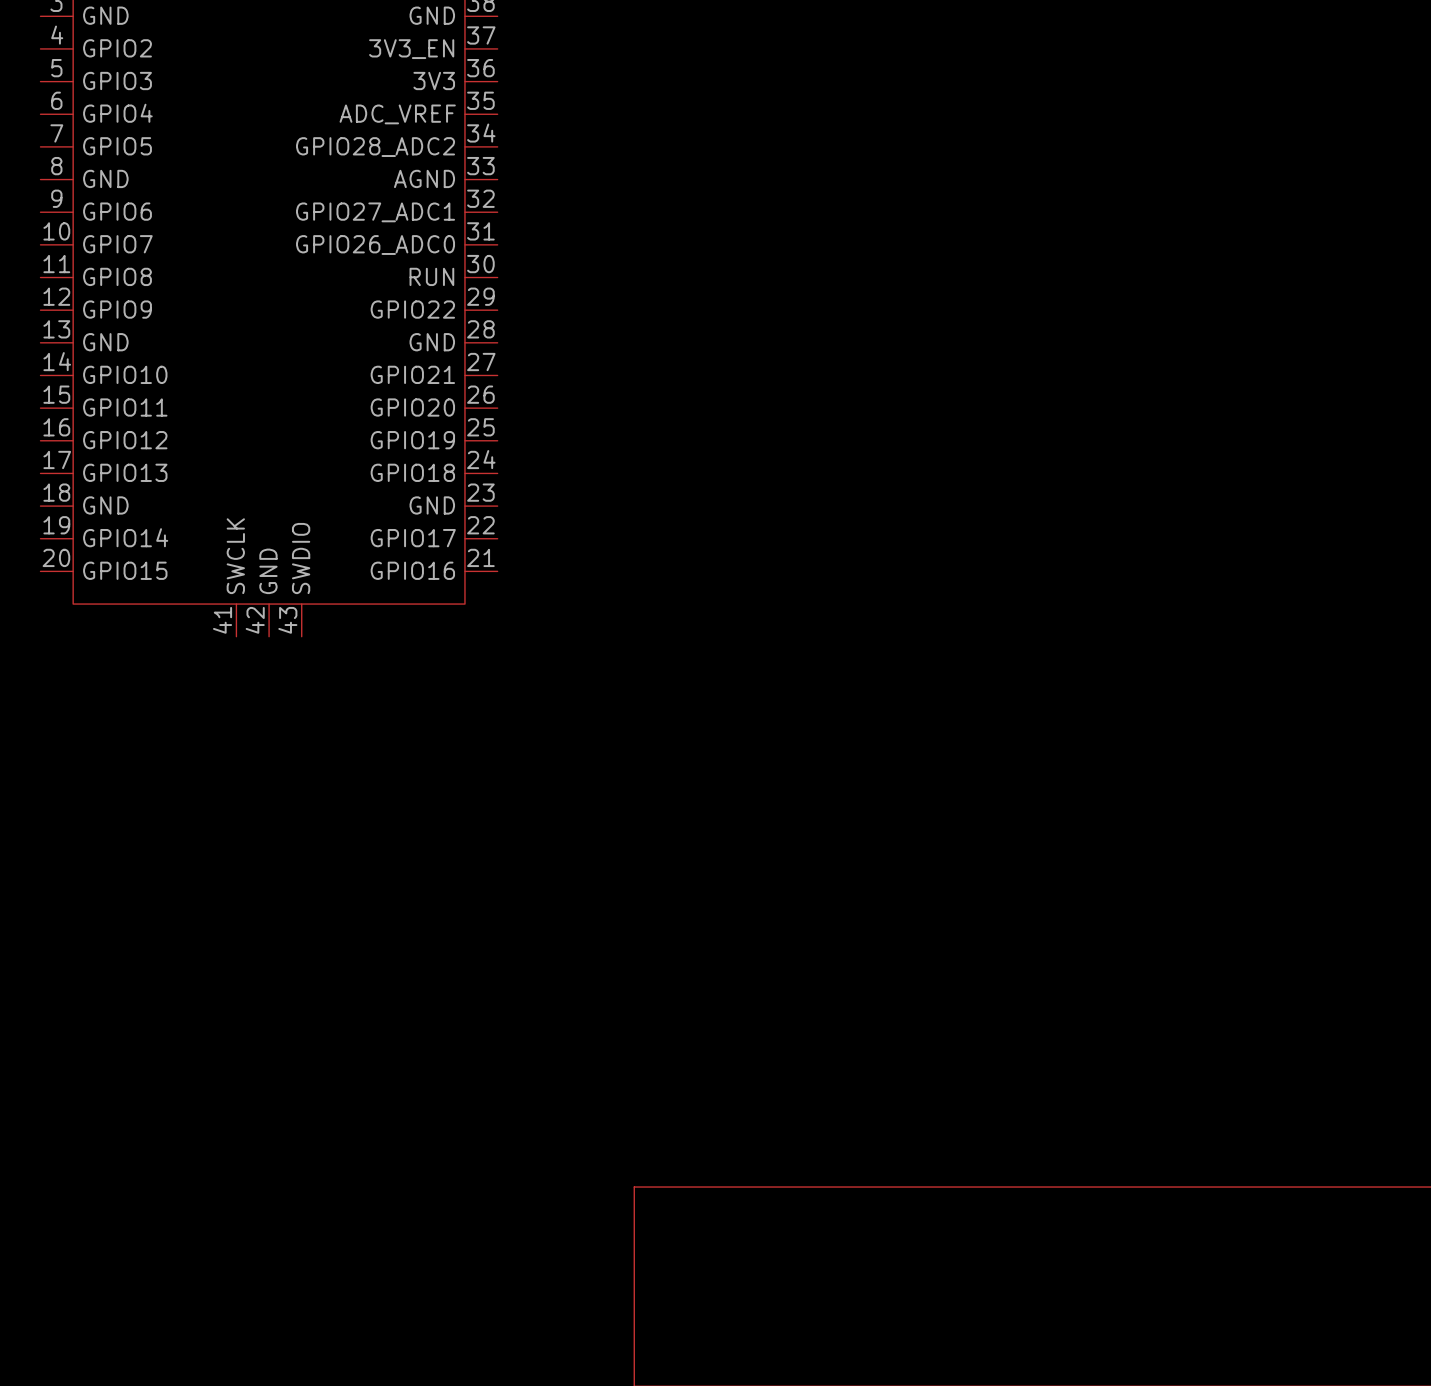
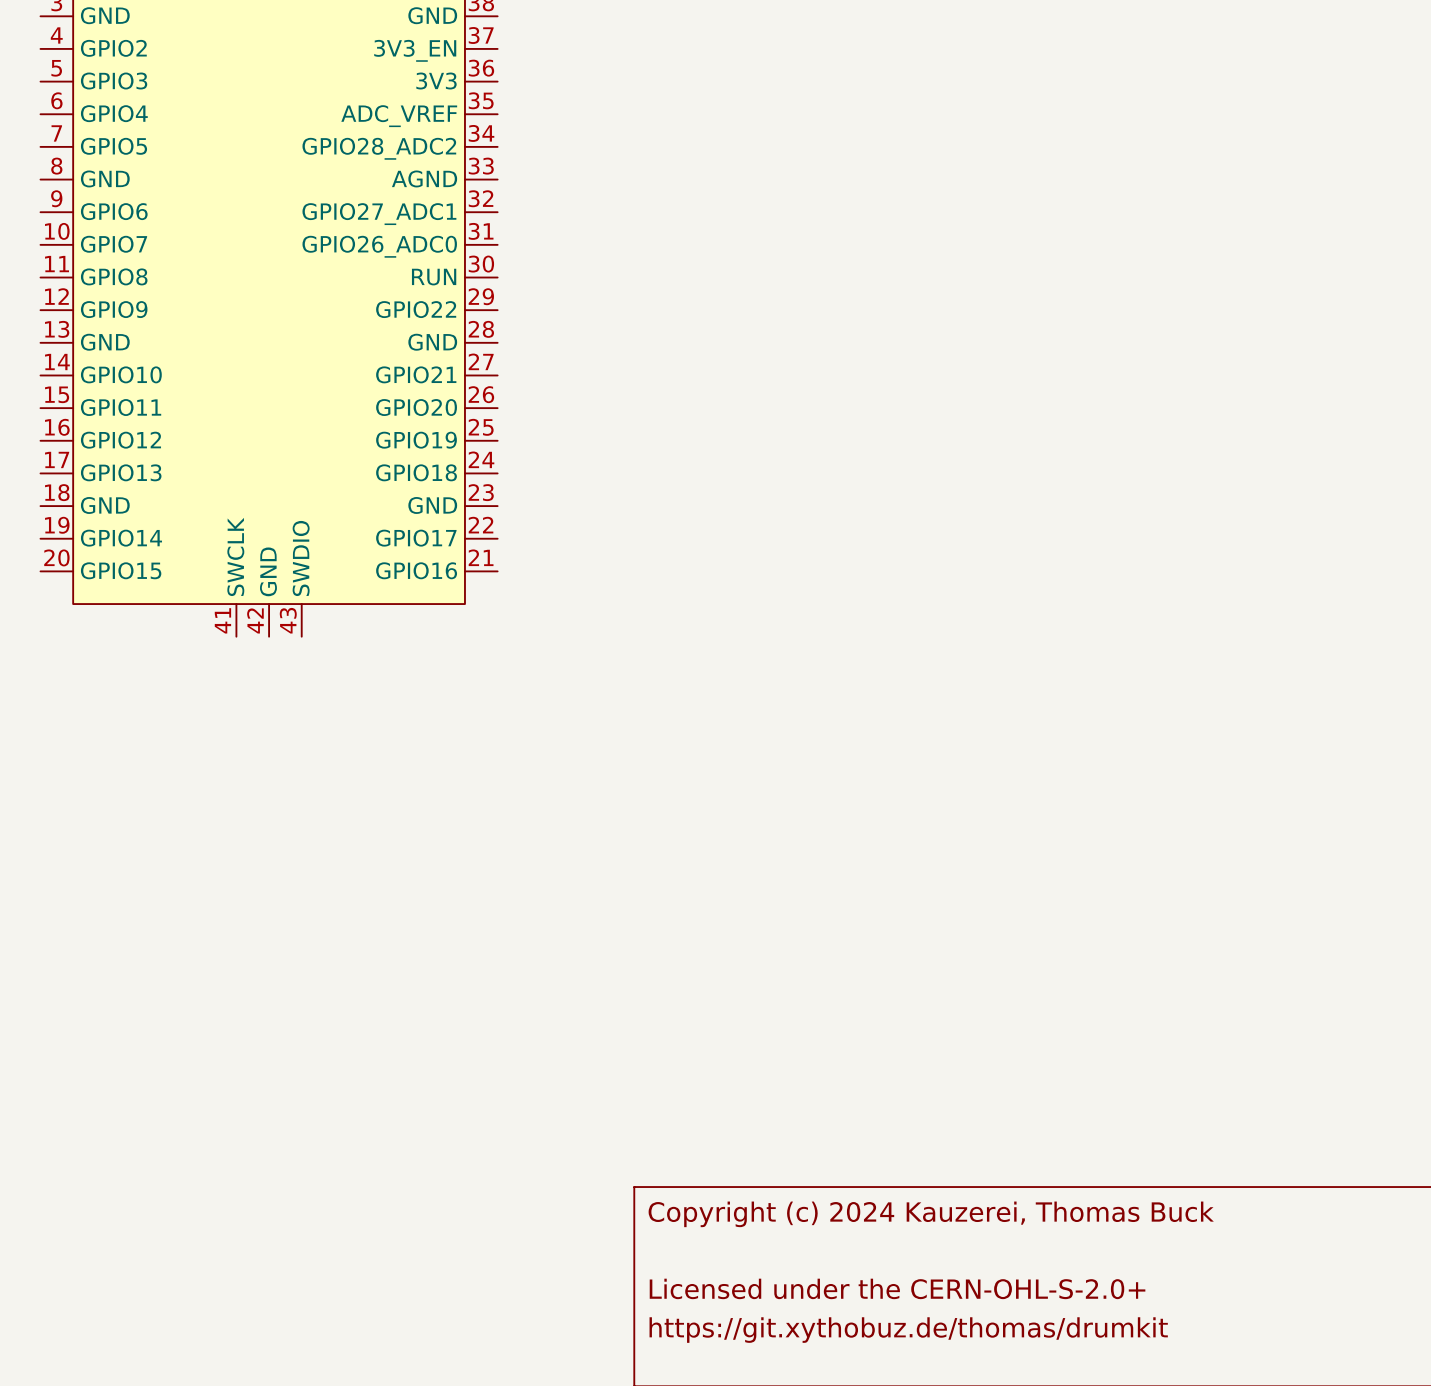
title block: none -> Copyright (c) 2024 Kauzerei, Thomas Buck (931, 1214)
title block: none -> Licensed under the CERN-OHL-S-2.0+ (897, 1288)
title block: none -> https://git.xythobuz.de/thomas/drumkit (908, 1330)

